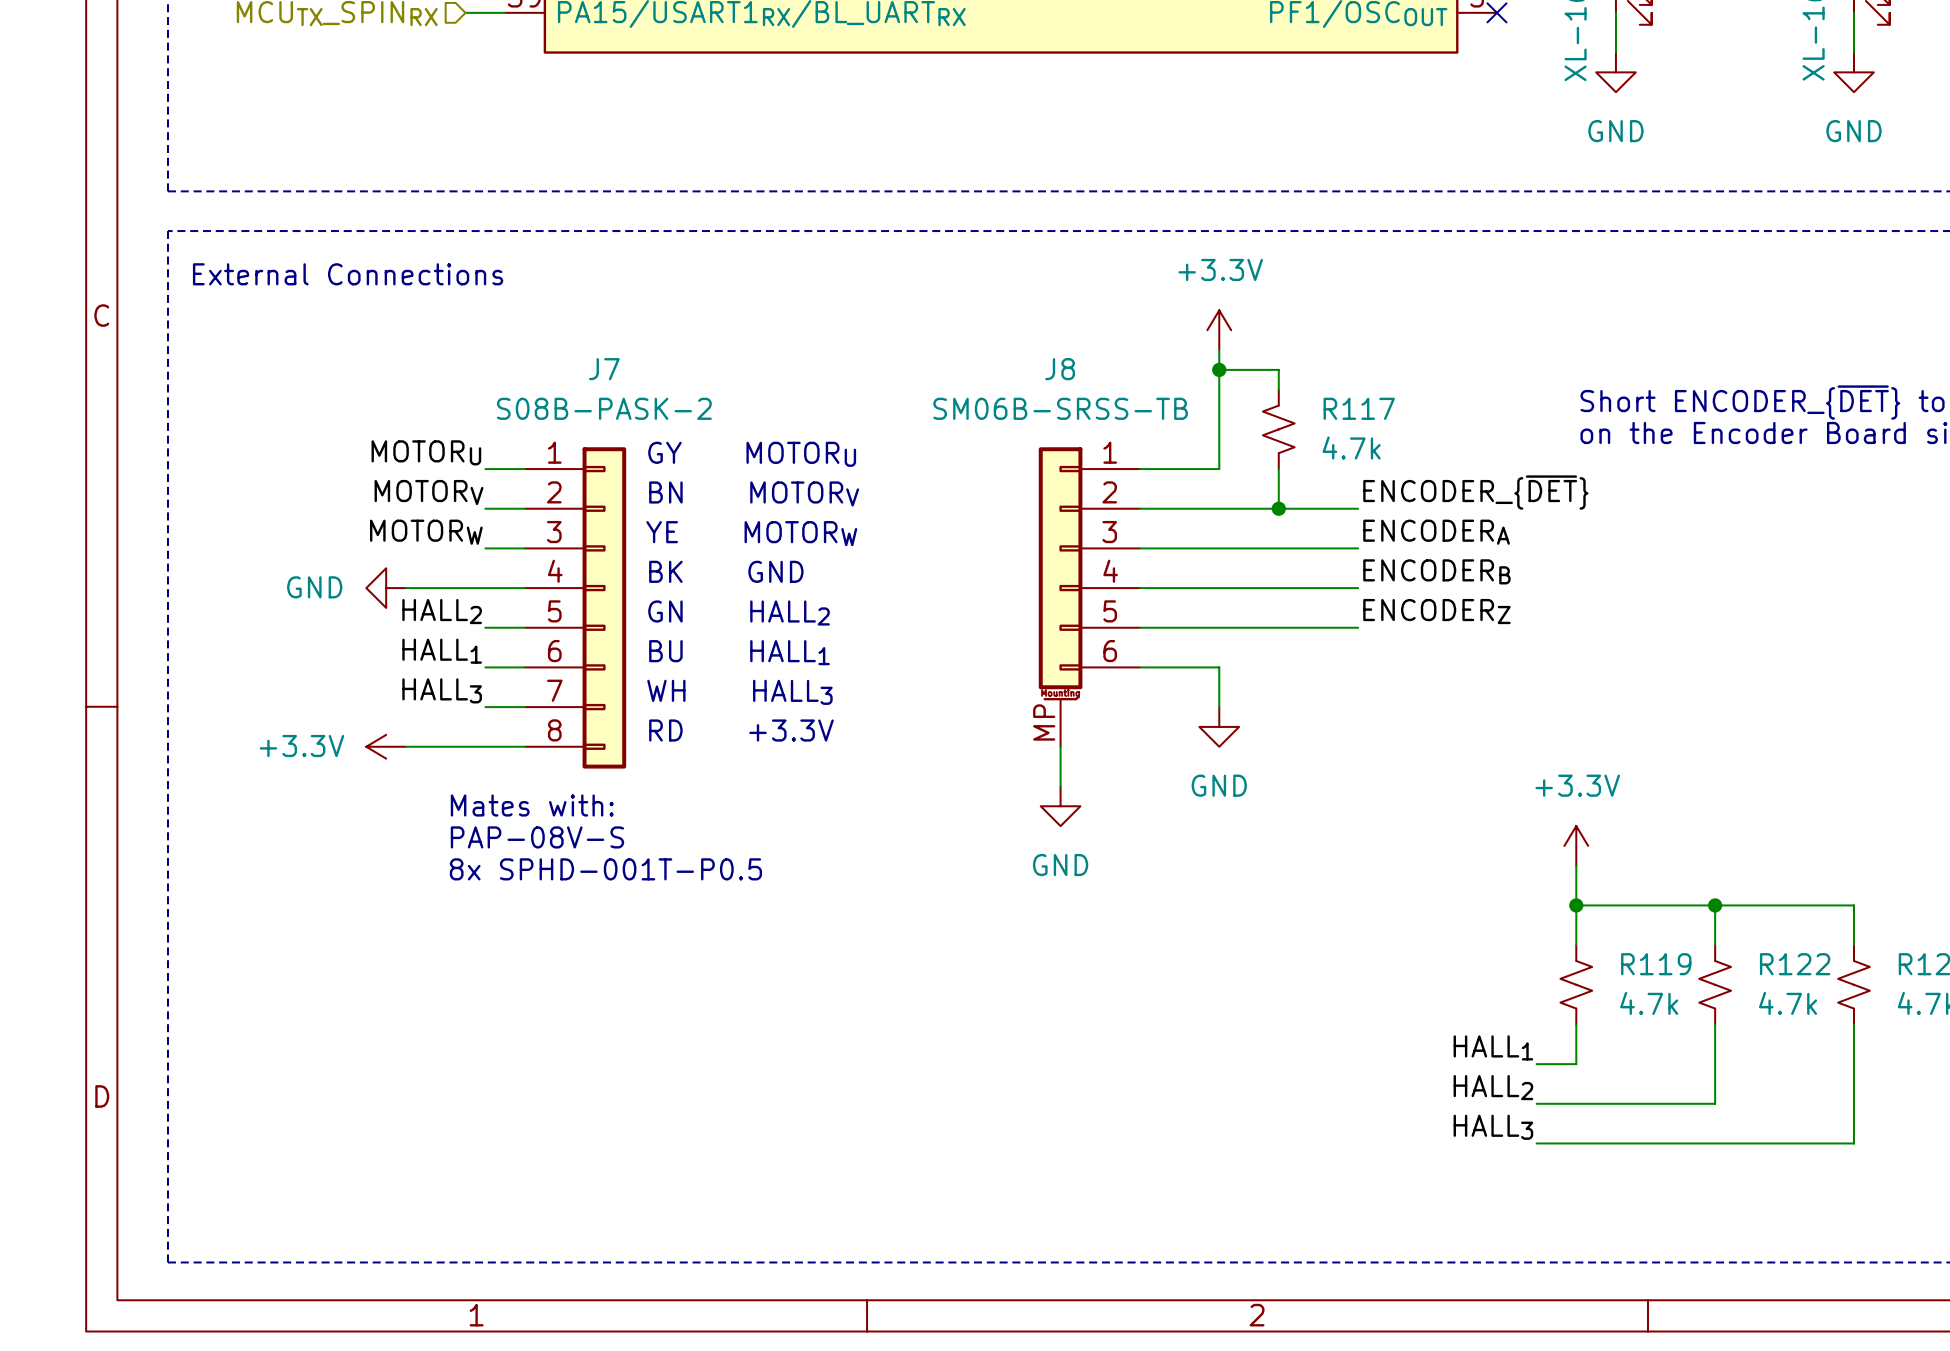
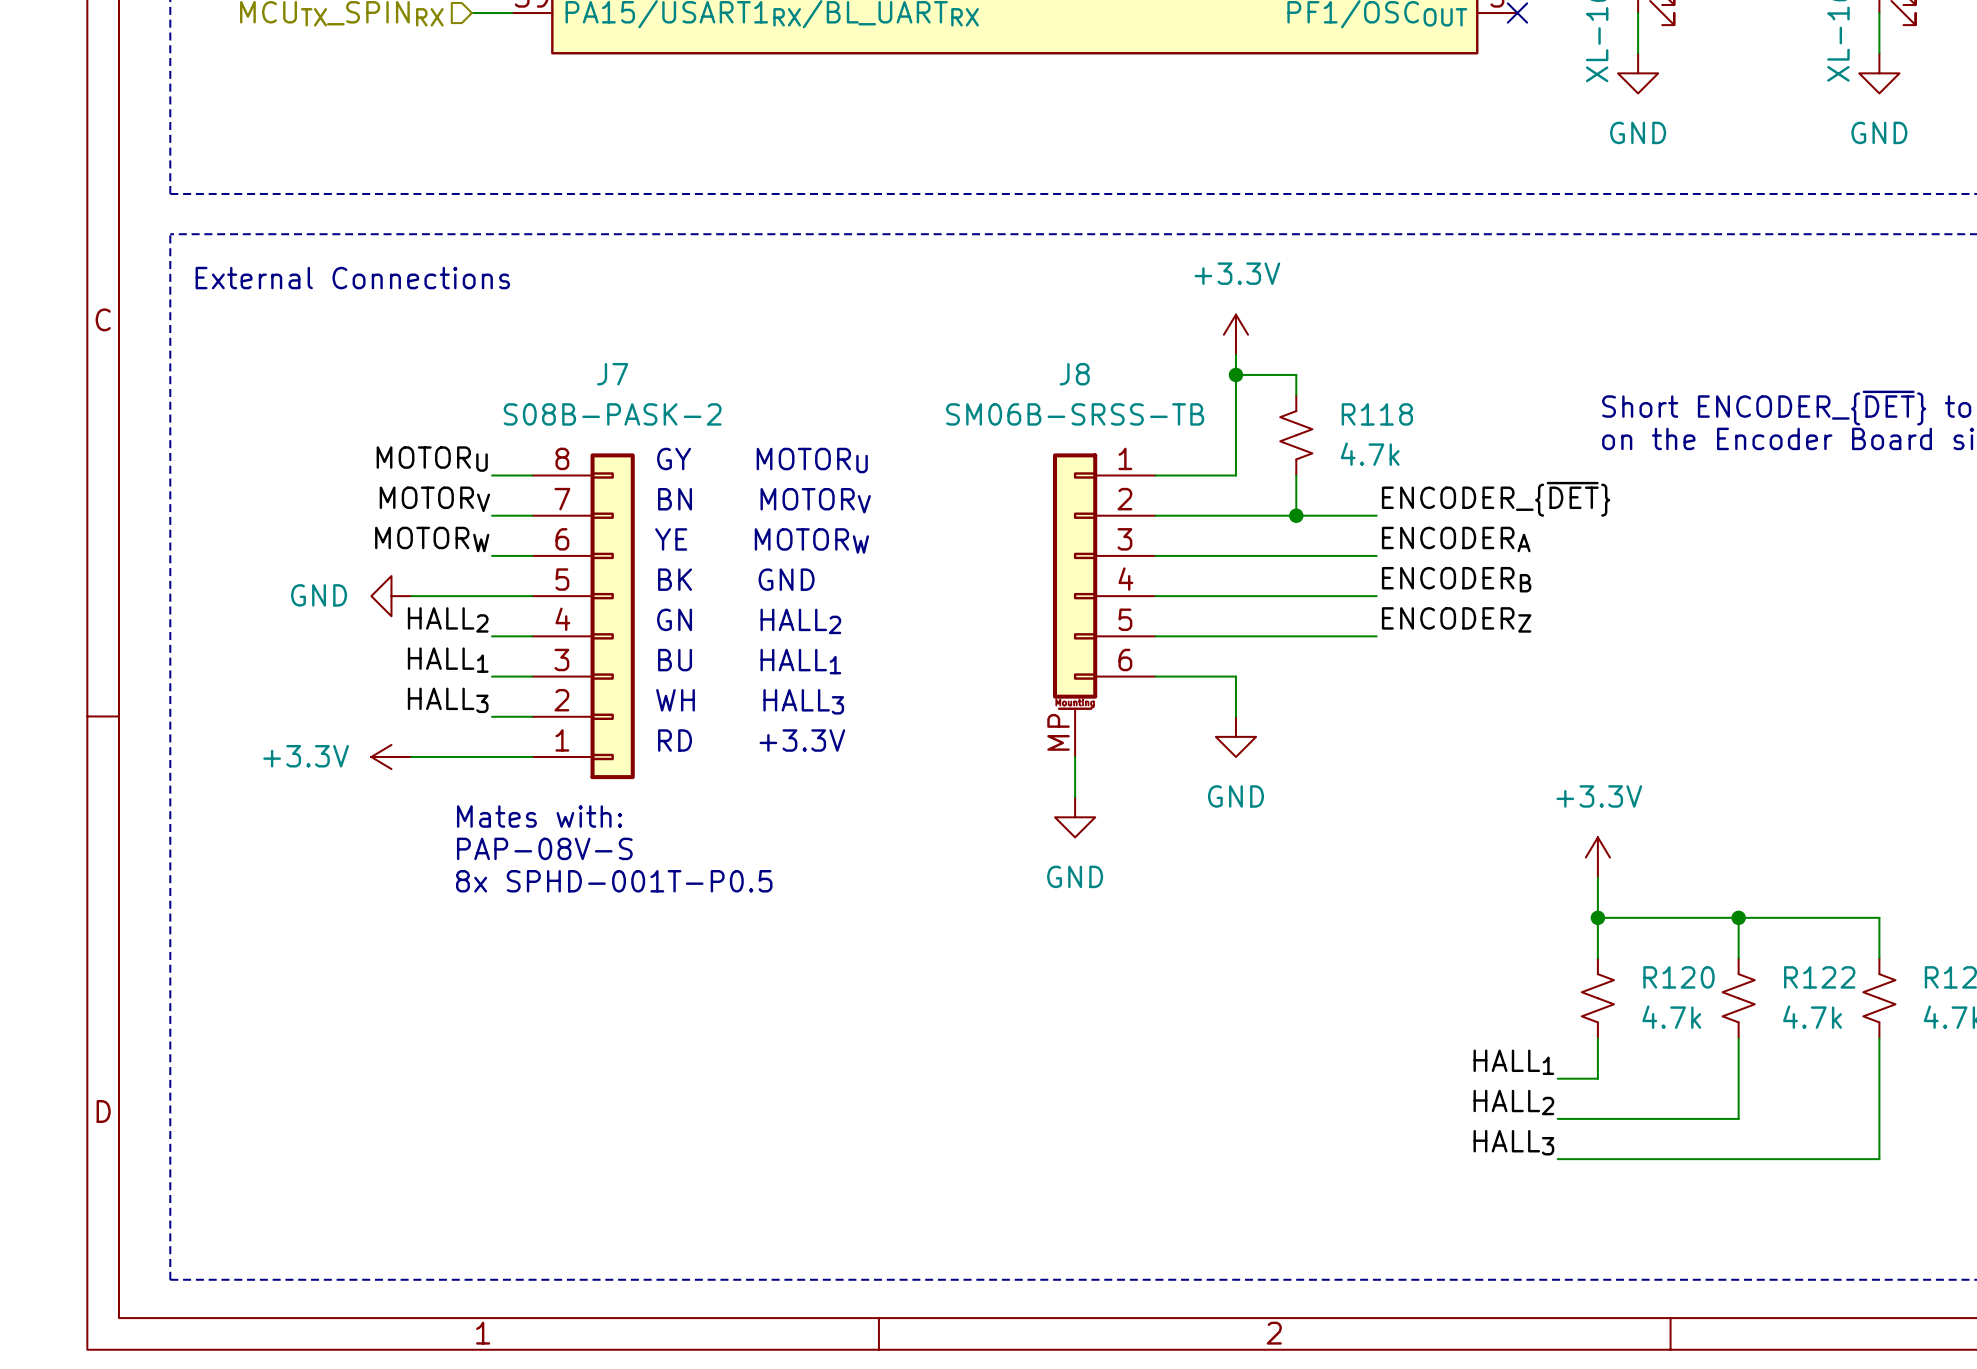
R117 name: R117 (1359, 408) -> R118 (1377, 414)
J7 flip: as is (604, 607) -> up-down (612, 616)
R119 name: R119 (1656, 964) -> R120 (1678, 977)

